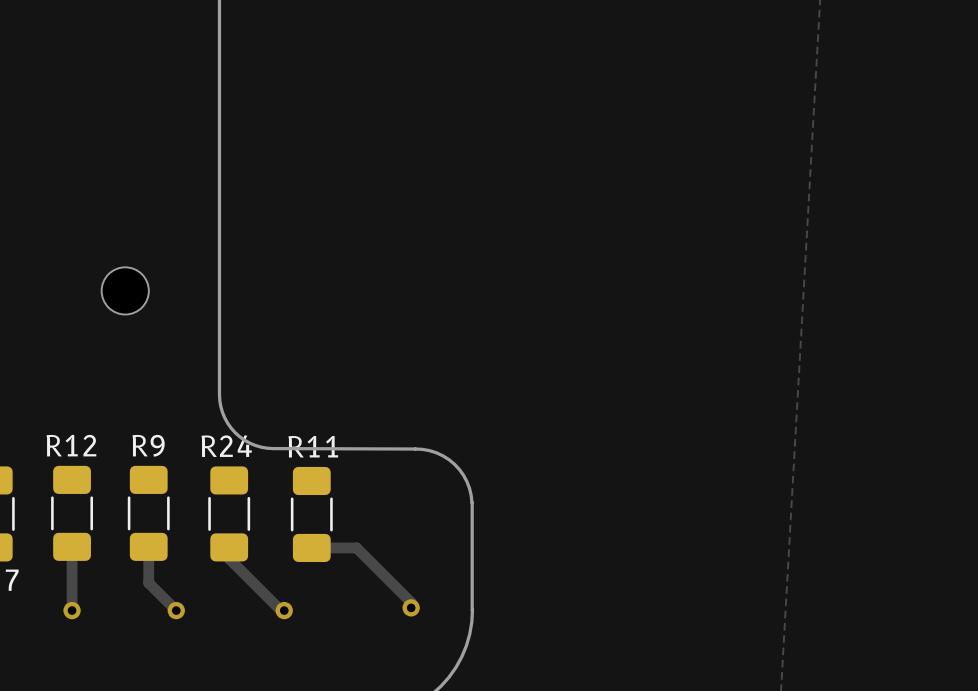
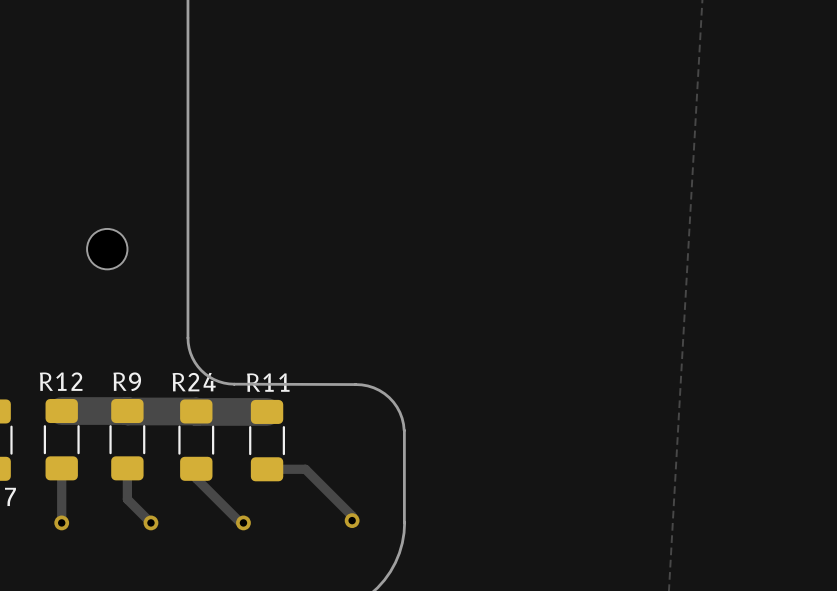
track: none -> (61, 411) (267, 411)

